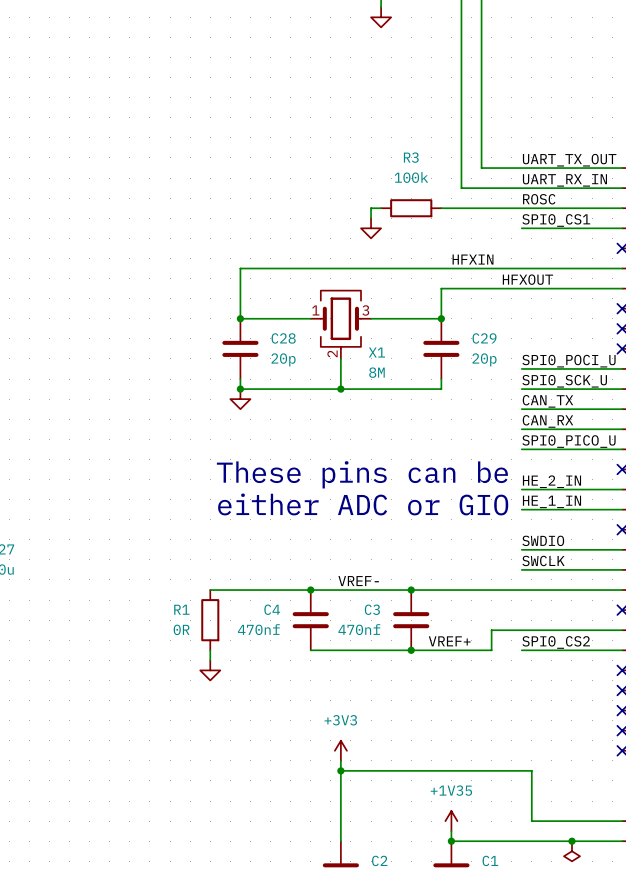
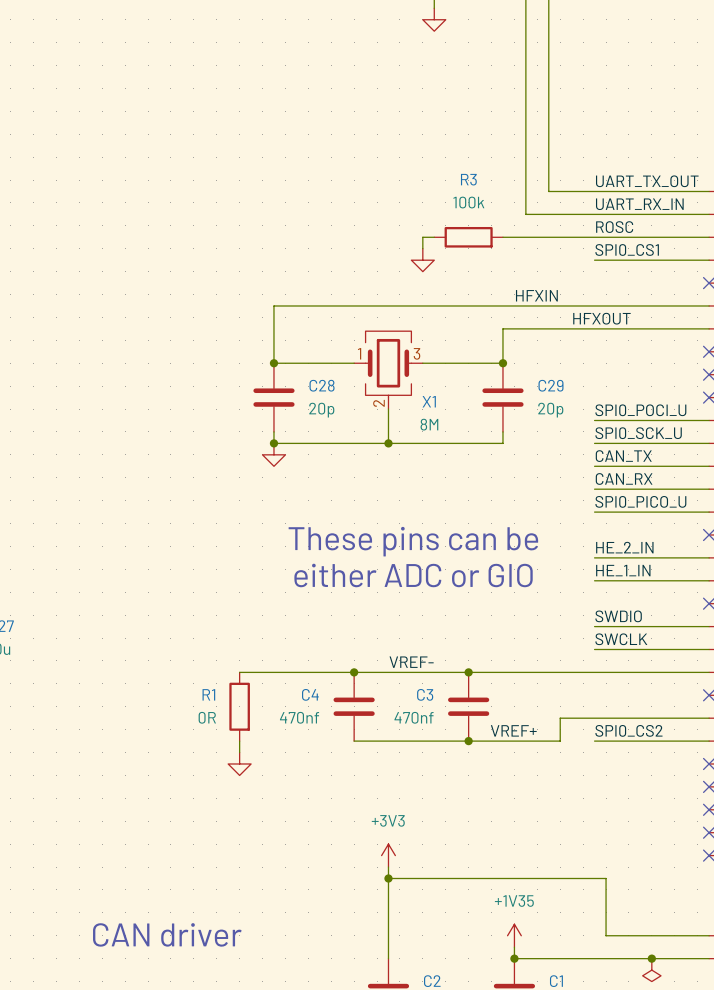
text: none -> CAN driver (167, 934)

